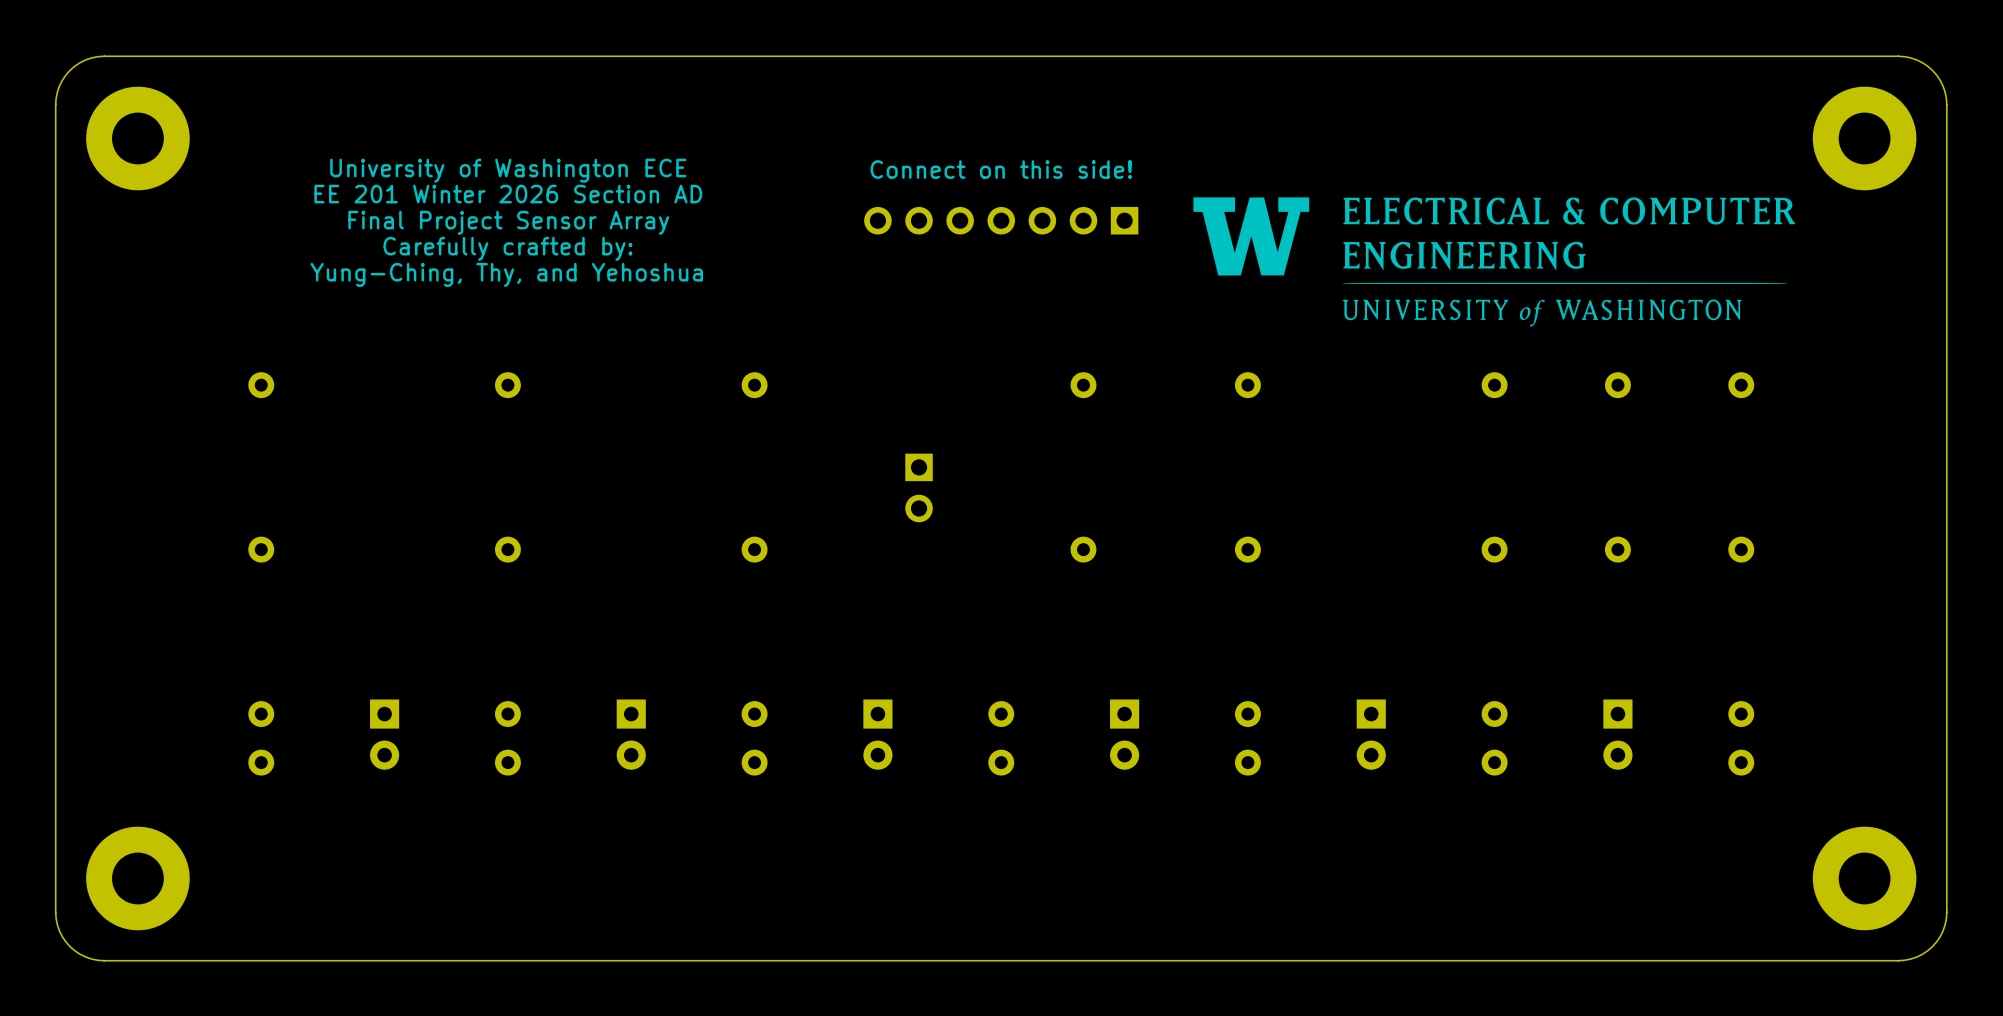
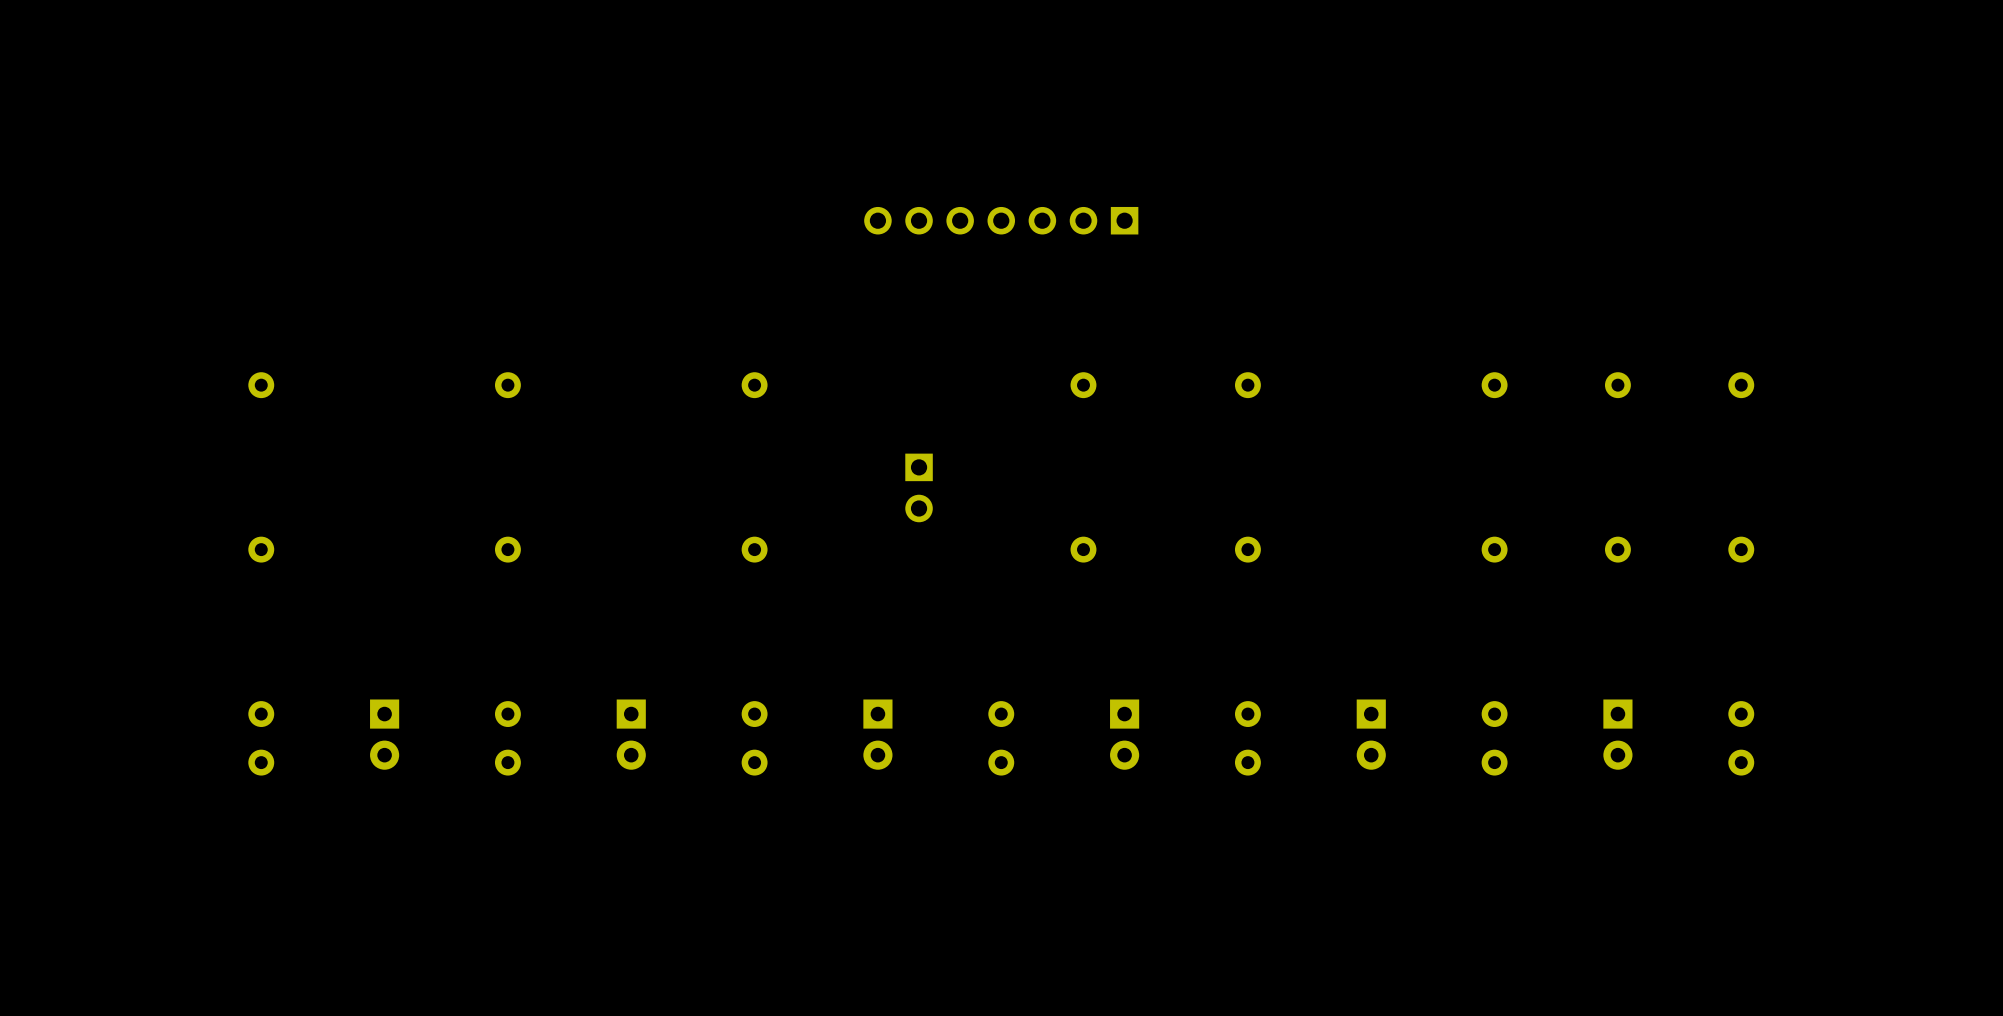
board edge: (1898, 56) (104, 56) (85, 59) (74, 66) (65, 75) (57, 92) (55, 104) (55, 912) (59, 930) (65, 941) (74, 950) (91, 959) (104, 960) (1898, 960) (1916, 957) (1927, 950) (1936, 941) (1945, 924) (1946, 912) (1946, 104) (1943, 86) (1932, 70) (1916, 59) (1898, 56) -> none
part: (137, 138) -> none
part: (1864, 138) -> none
text: Connect on this side! (1001, 169) -> none
text: University of Washington ECE (508, 170) -> none
text: EE 201 Winter 2026 Section AD (508, 194) -> none
drawing: [1193, 197, 1796, 327] -> none
text: Final Project Sensor Array (508, 222) -> none
text: Carefully crafted by: (507, 248) -> none
text: Yung-Ching, Thy, and Yehoshua (506, 274) -> none
part: (137, 878) -> none
part: (1864, 878) -> none

